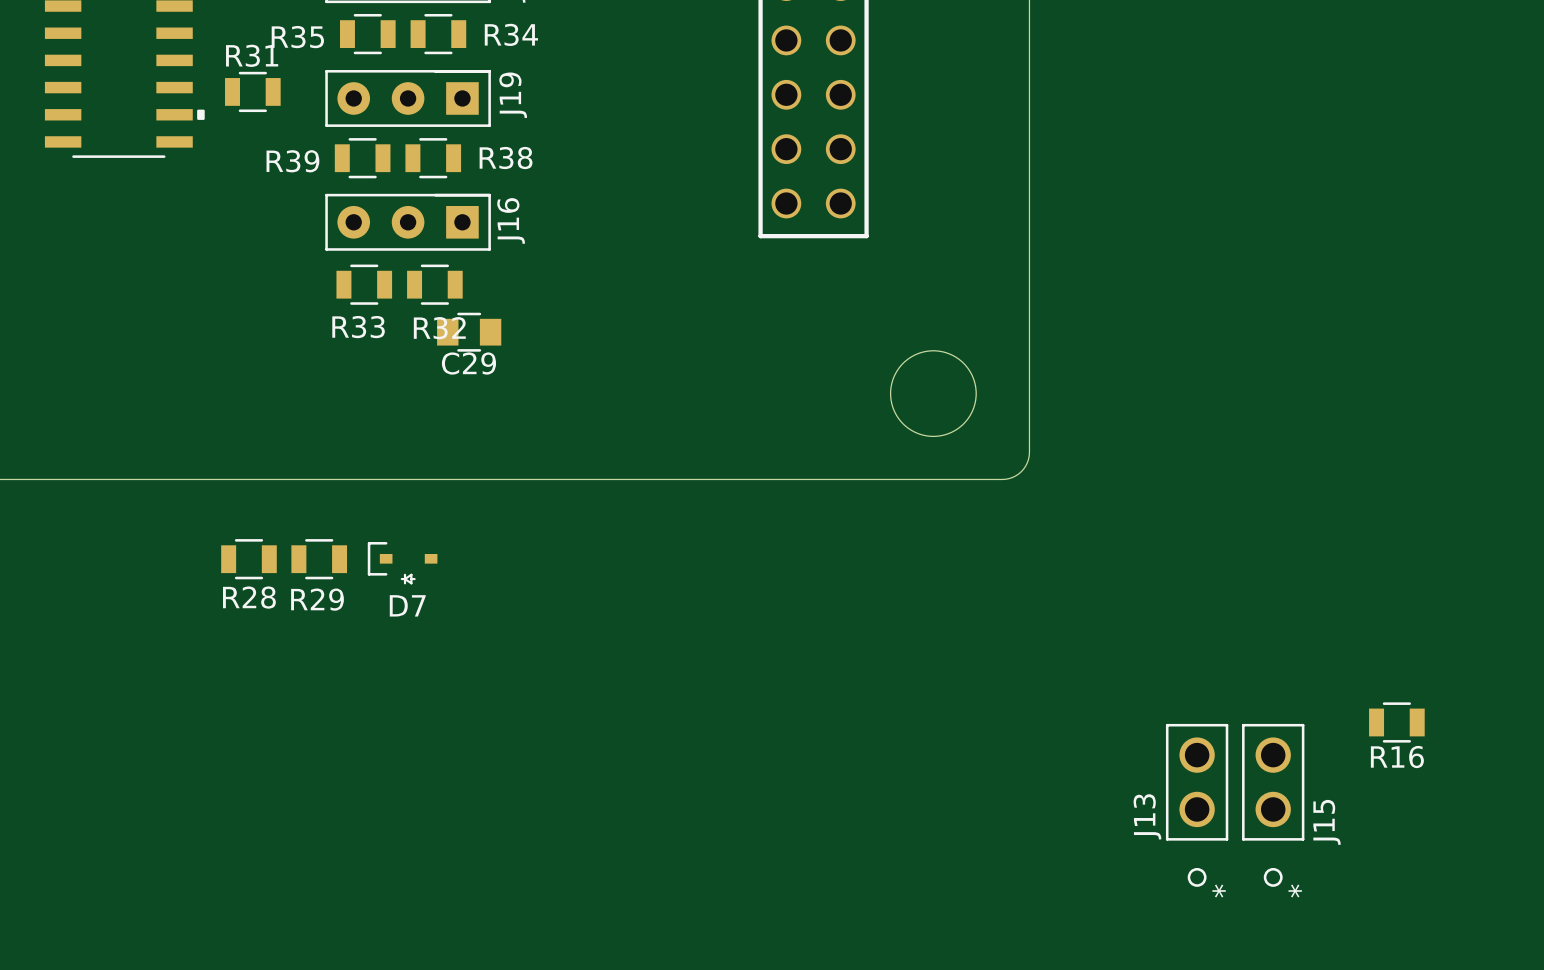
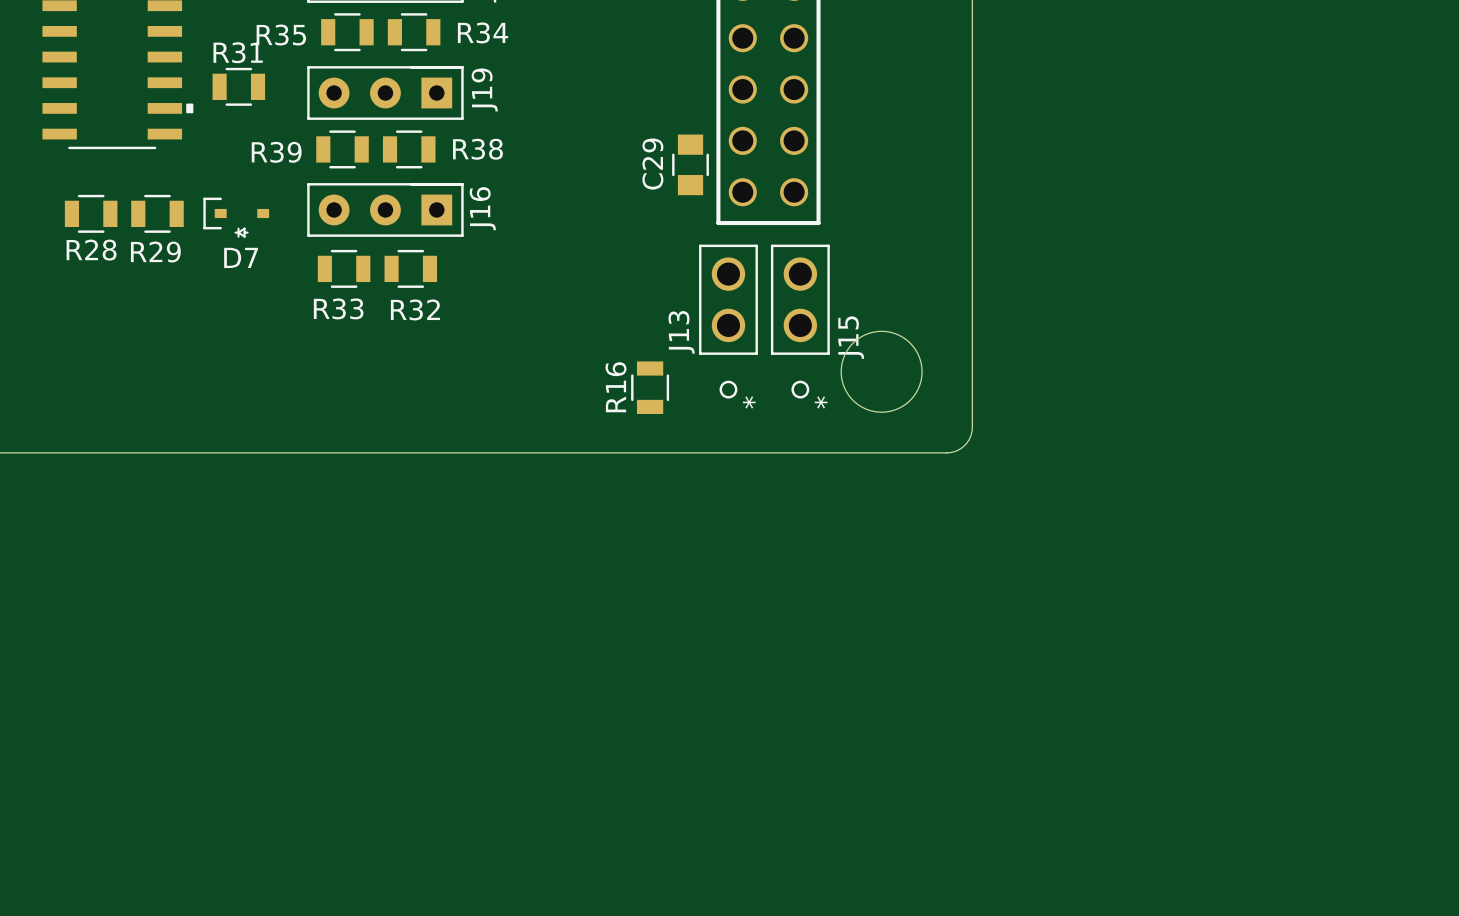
C29 rotation: 0° (469, 332) -> 90° clockwise (690, 164)
C29 position: (469, 332) -> (690, 164)
R28 position: (248, 559) -> (91, 213)
R29 position: (319, 559) -> (157, 213)
D7 position: (402, 563) -> (236, 217)
R16 rotation: 0° (1396, 722) -> 90° clockwise (650, 387)
R16 position: (1396, 722) -> (650, 387)
J13 position: (1197, 805) -> (728, 321)
J15 position: (1273, 805) -> (800, 321)

